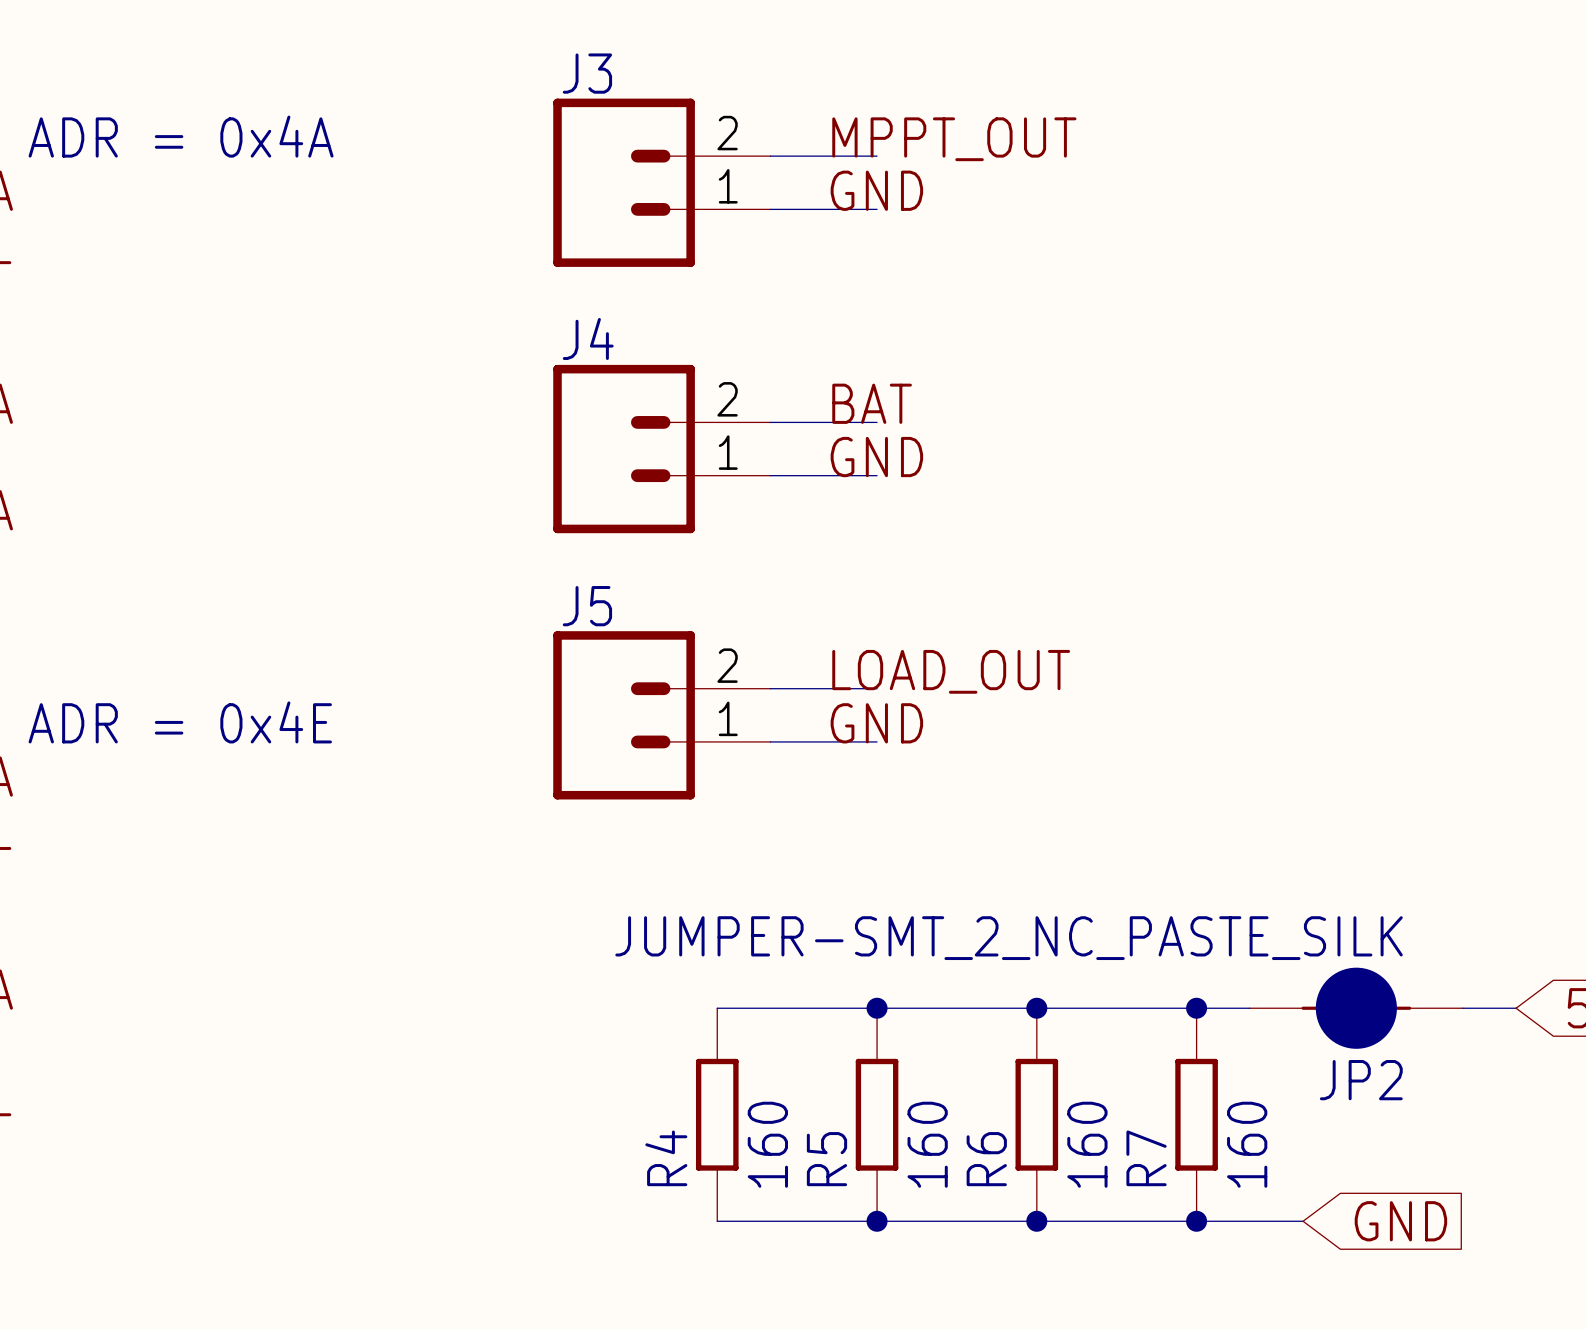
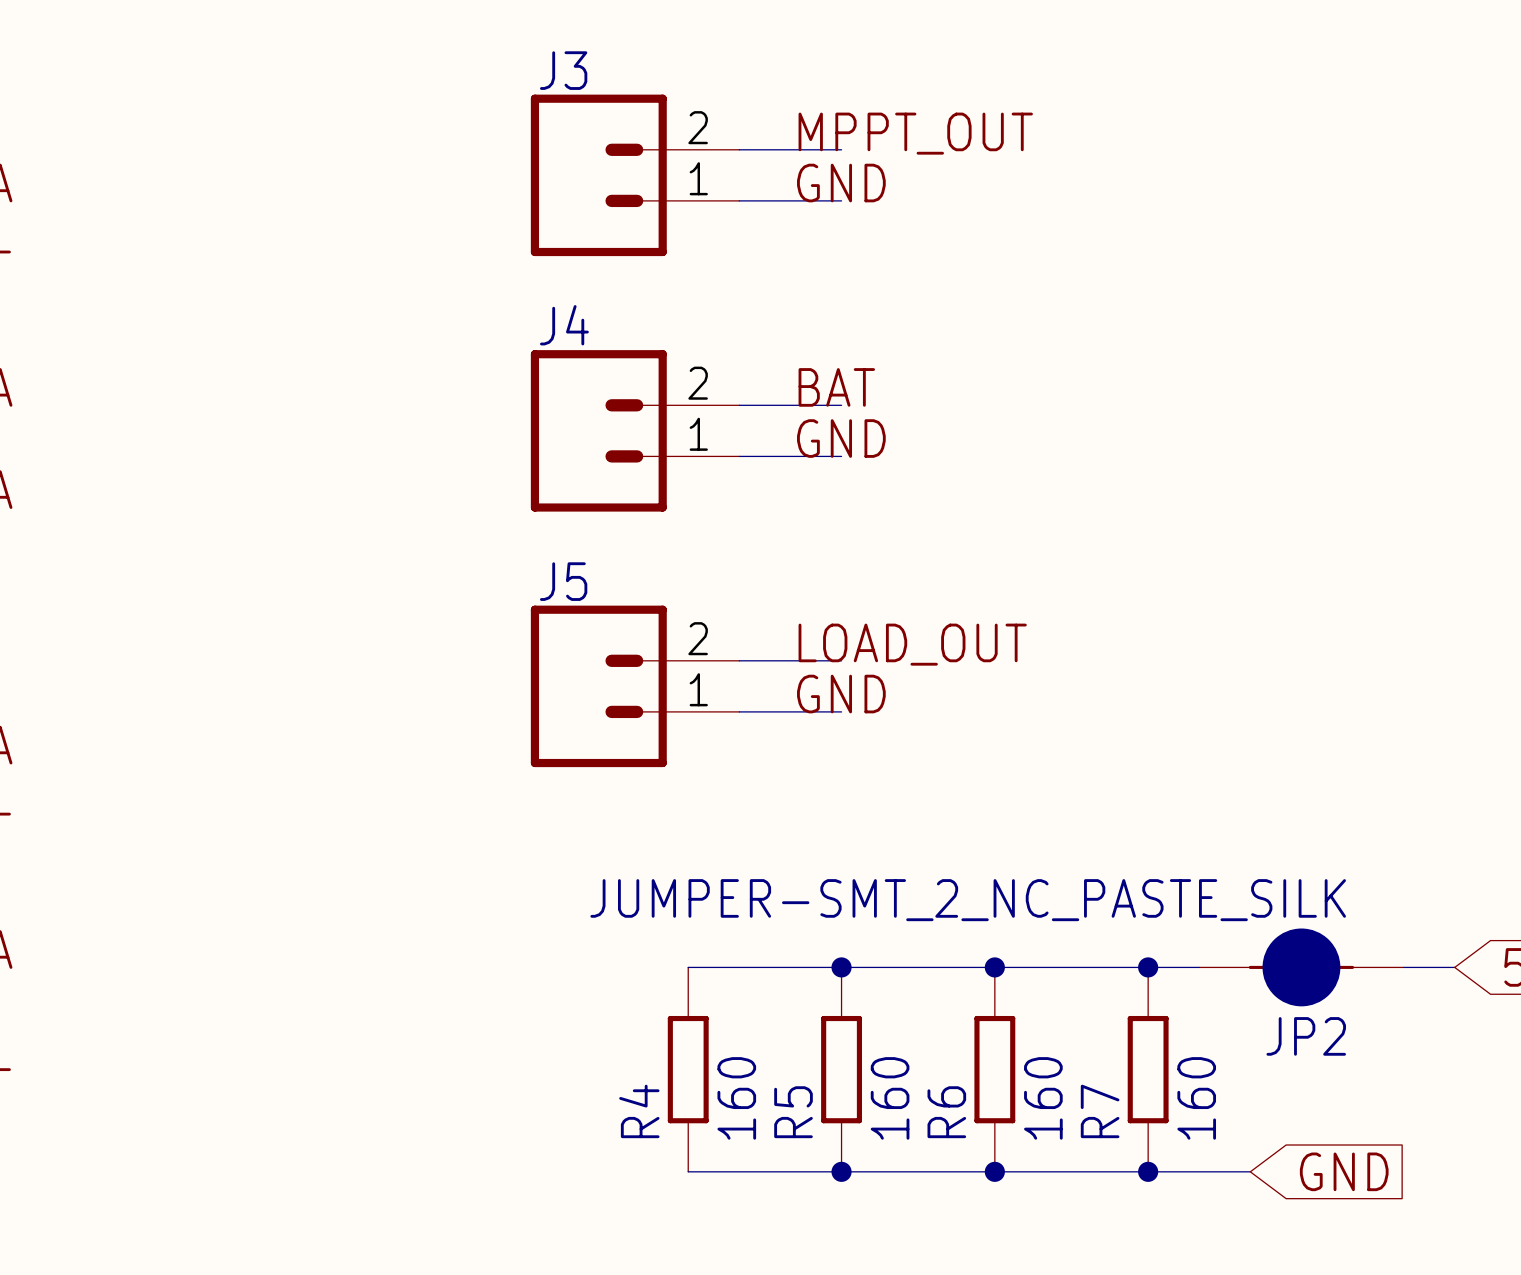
text: ADR = 0x4A (181, 136) -> none
text: ADR = 0x4E (180, 722) -> none

